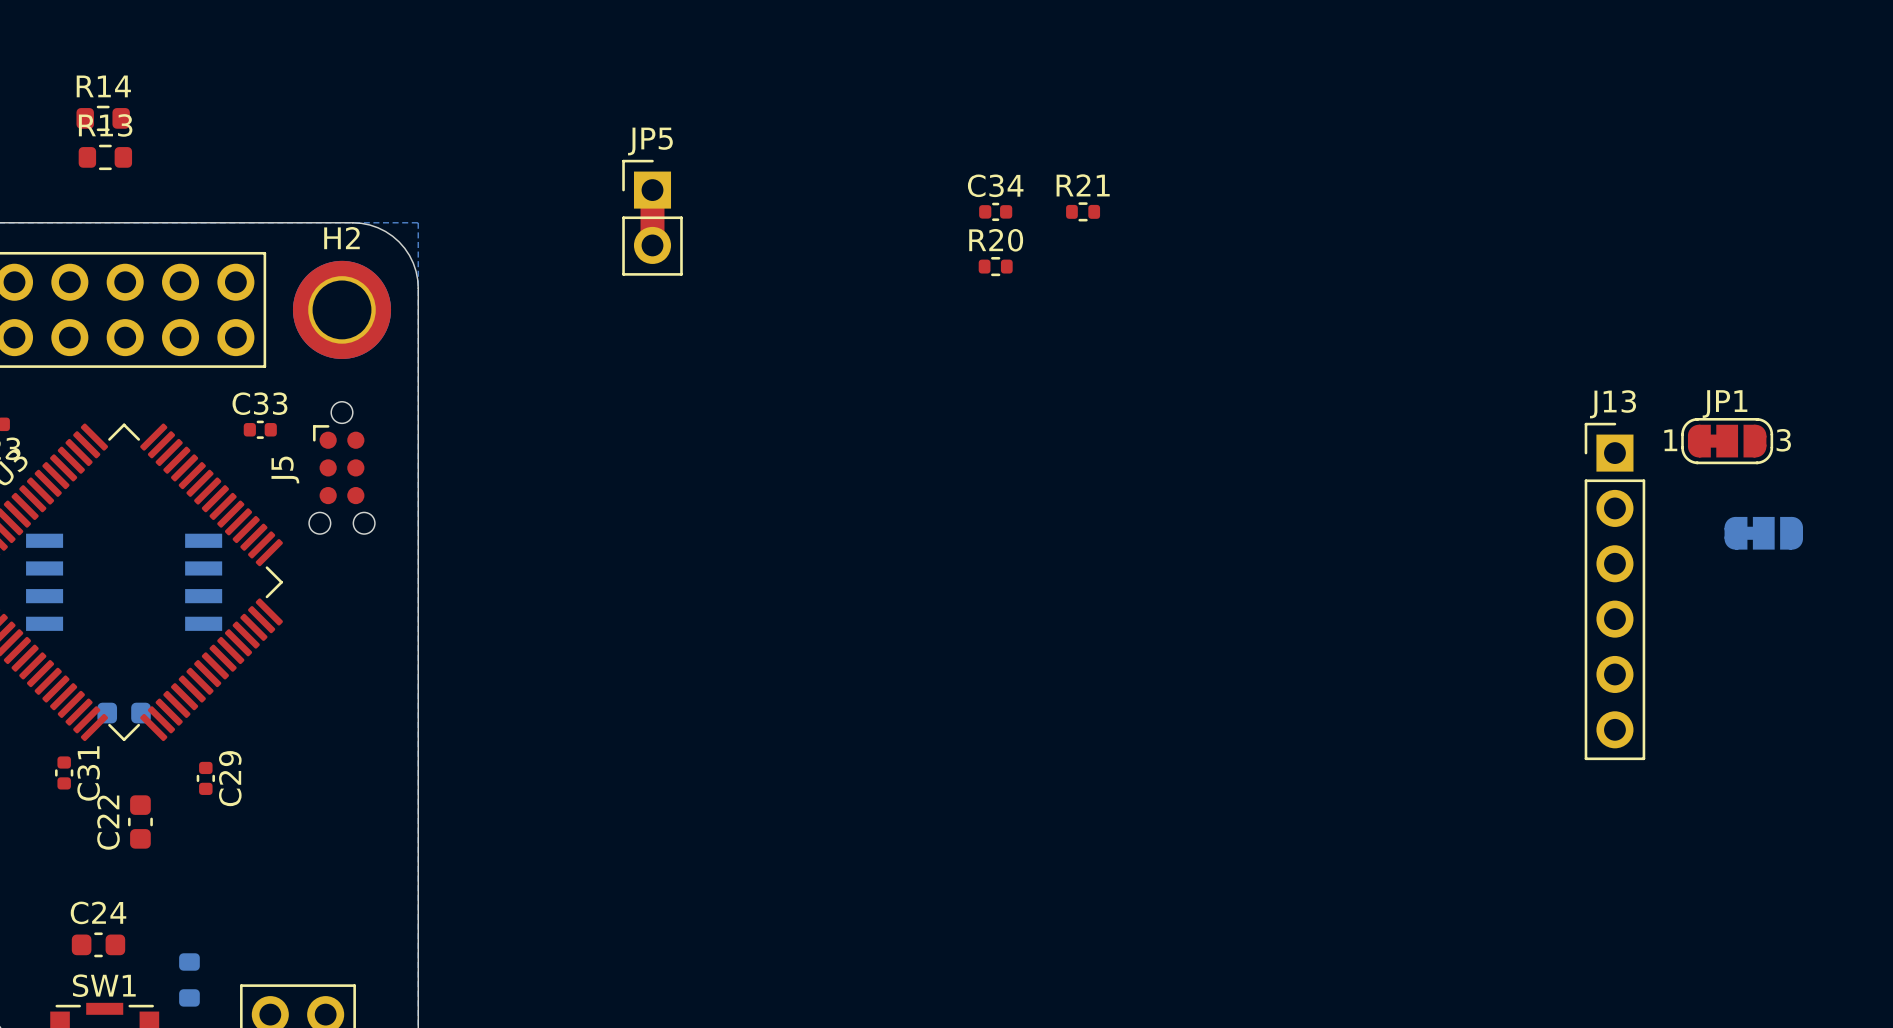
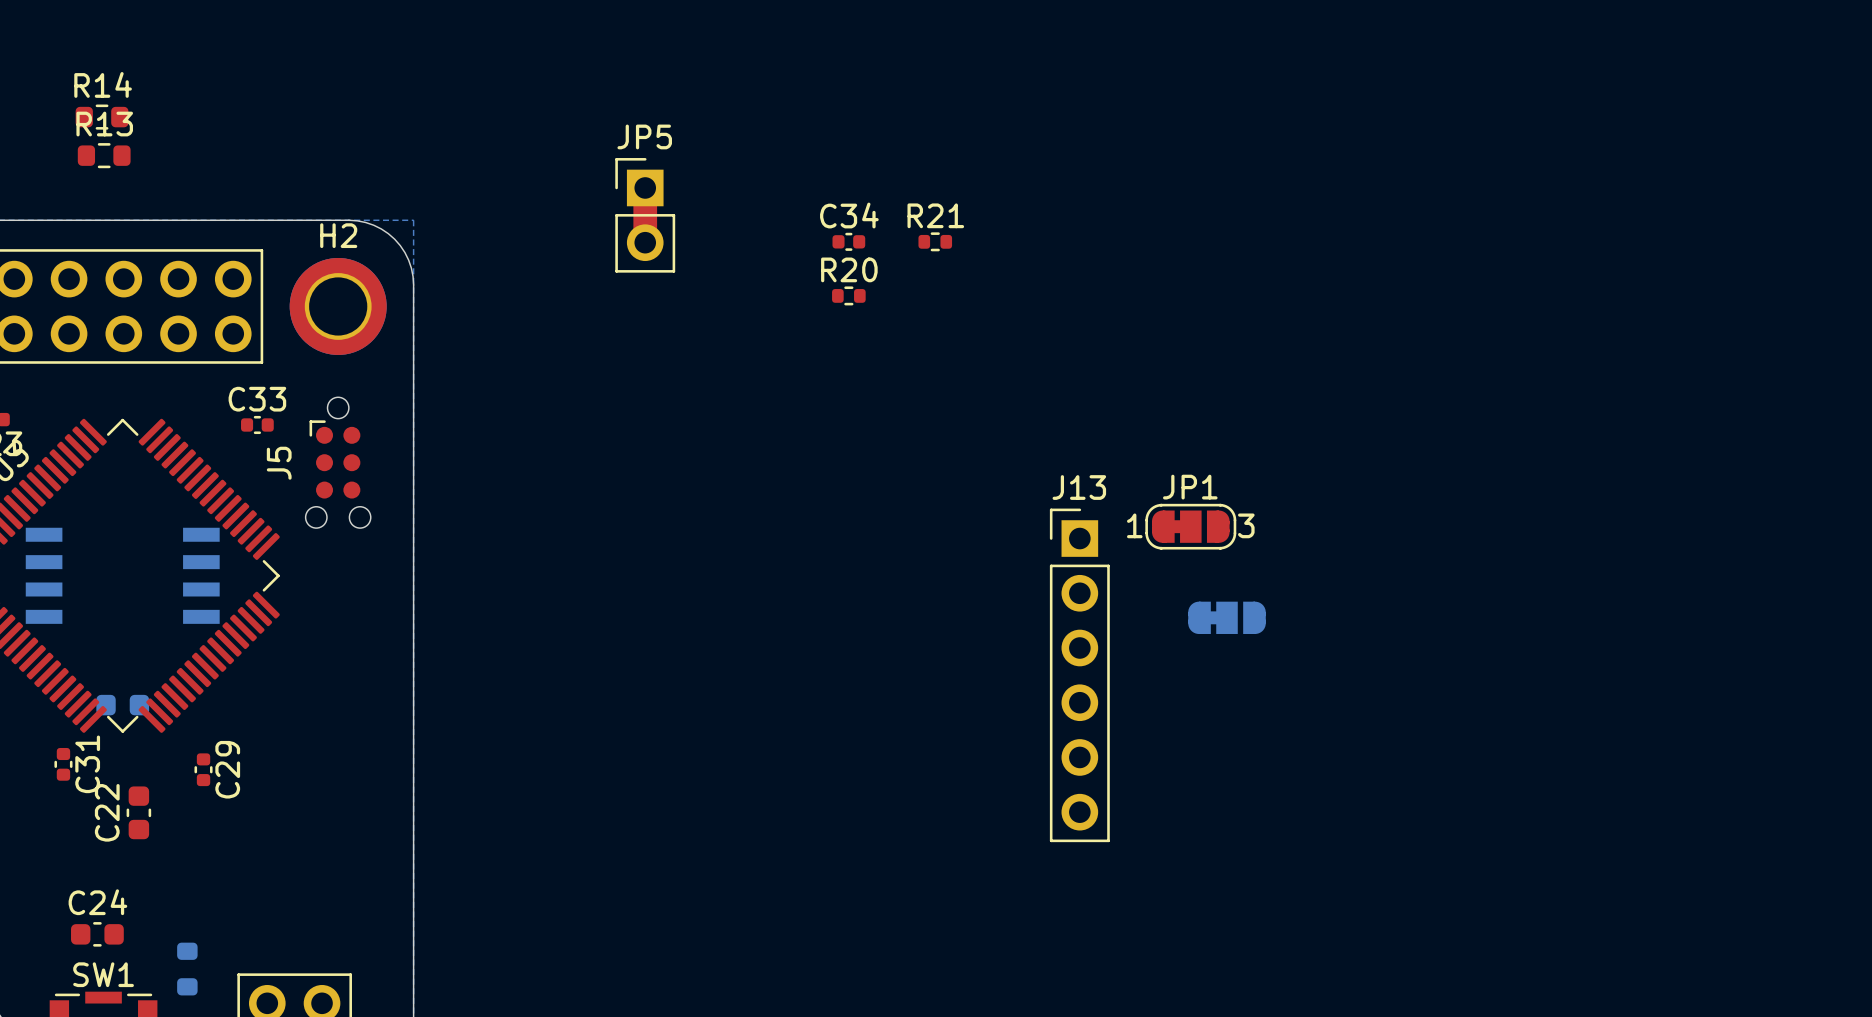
C34 position: (995, 211) -> (848, 241)
R21 position: (1083, 211) -> (935, 241)
R20 position: (995, 266) -> (848, 295)
JP1 position: (1727, 441) -> (1190, 526)
part position: (1763, 533) -> (1227, 617)
J13 position: (1614, 591) -> (1079, 675)

